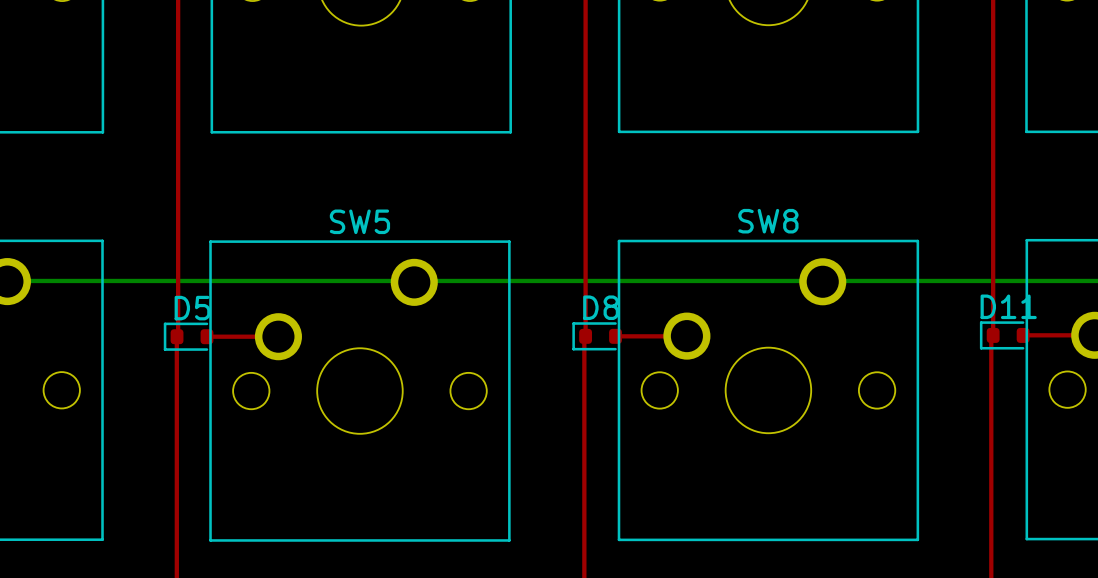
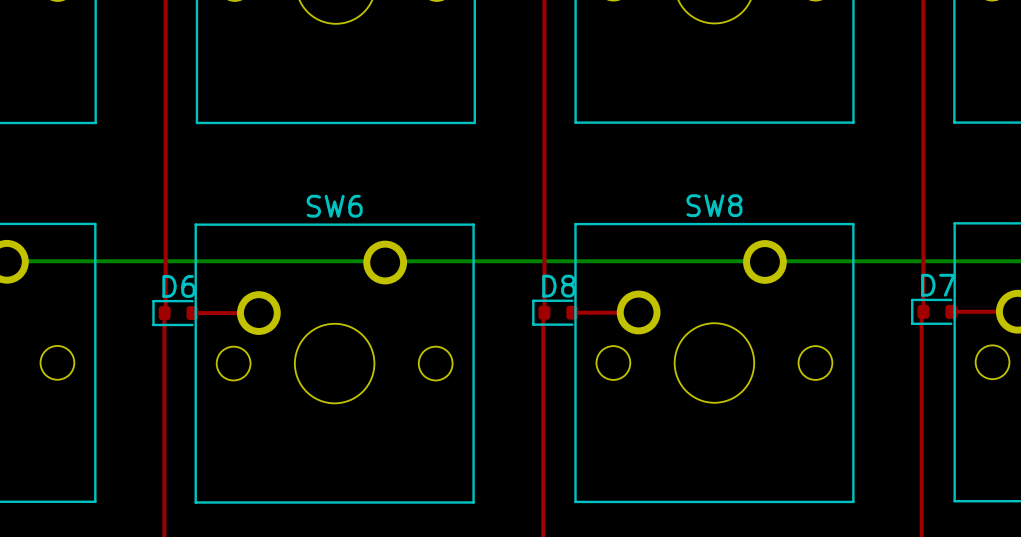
SW5 name: SW5 (359, 221) -> SW6 (334, 206)
D11 name: D11 (1008, 306) -> D7 (938, 285)
D5 name: D5 (192, 308) -> D6 (178, 286)

